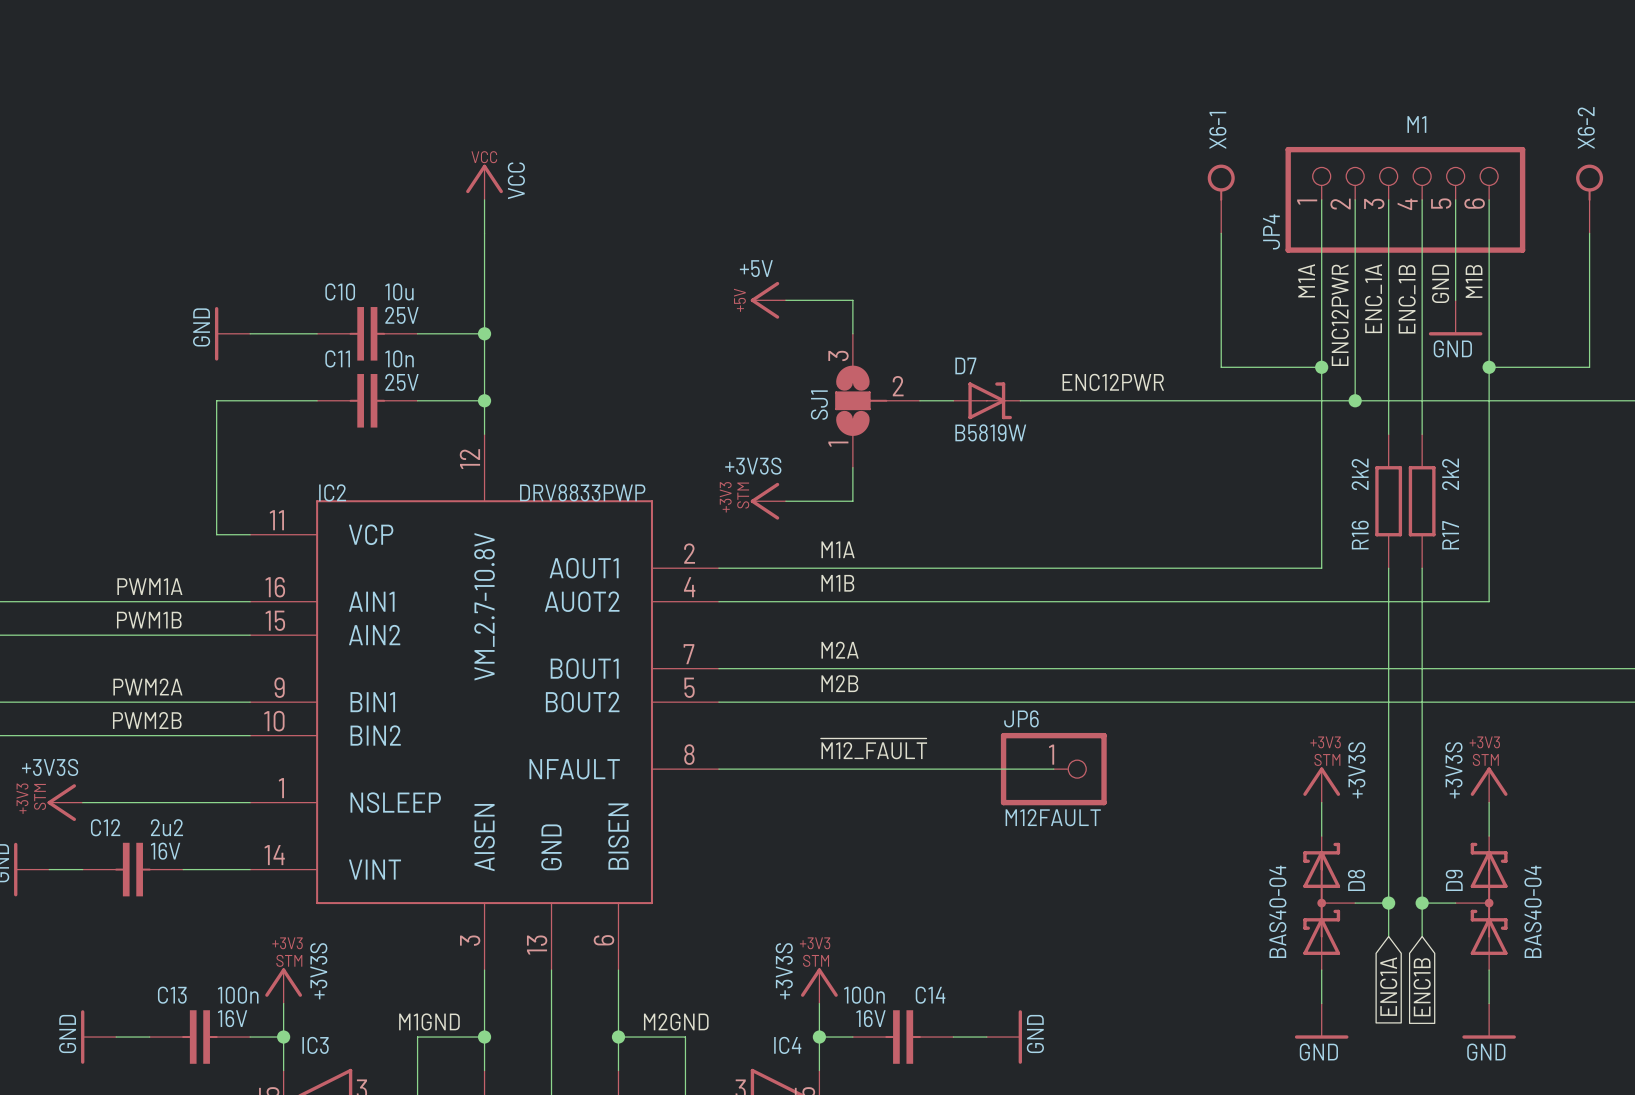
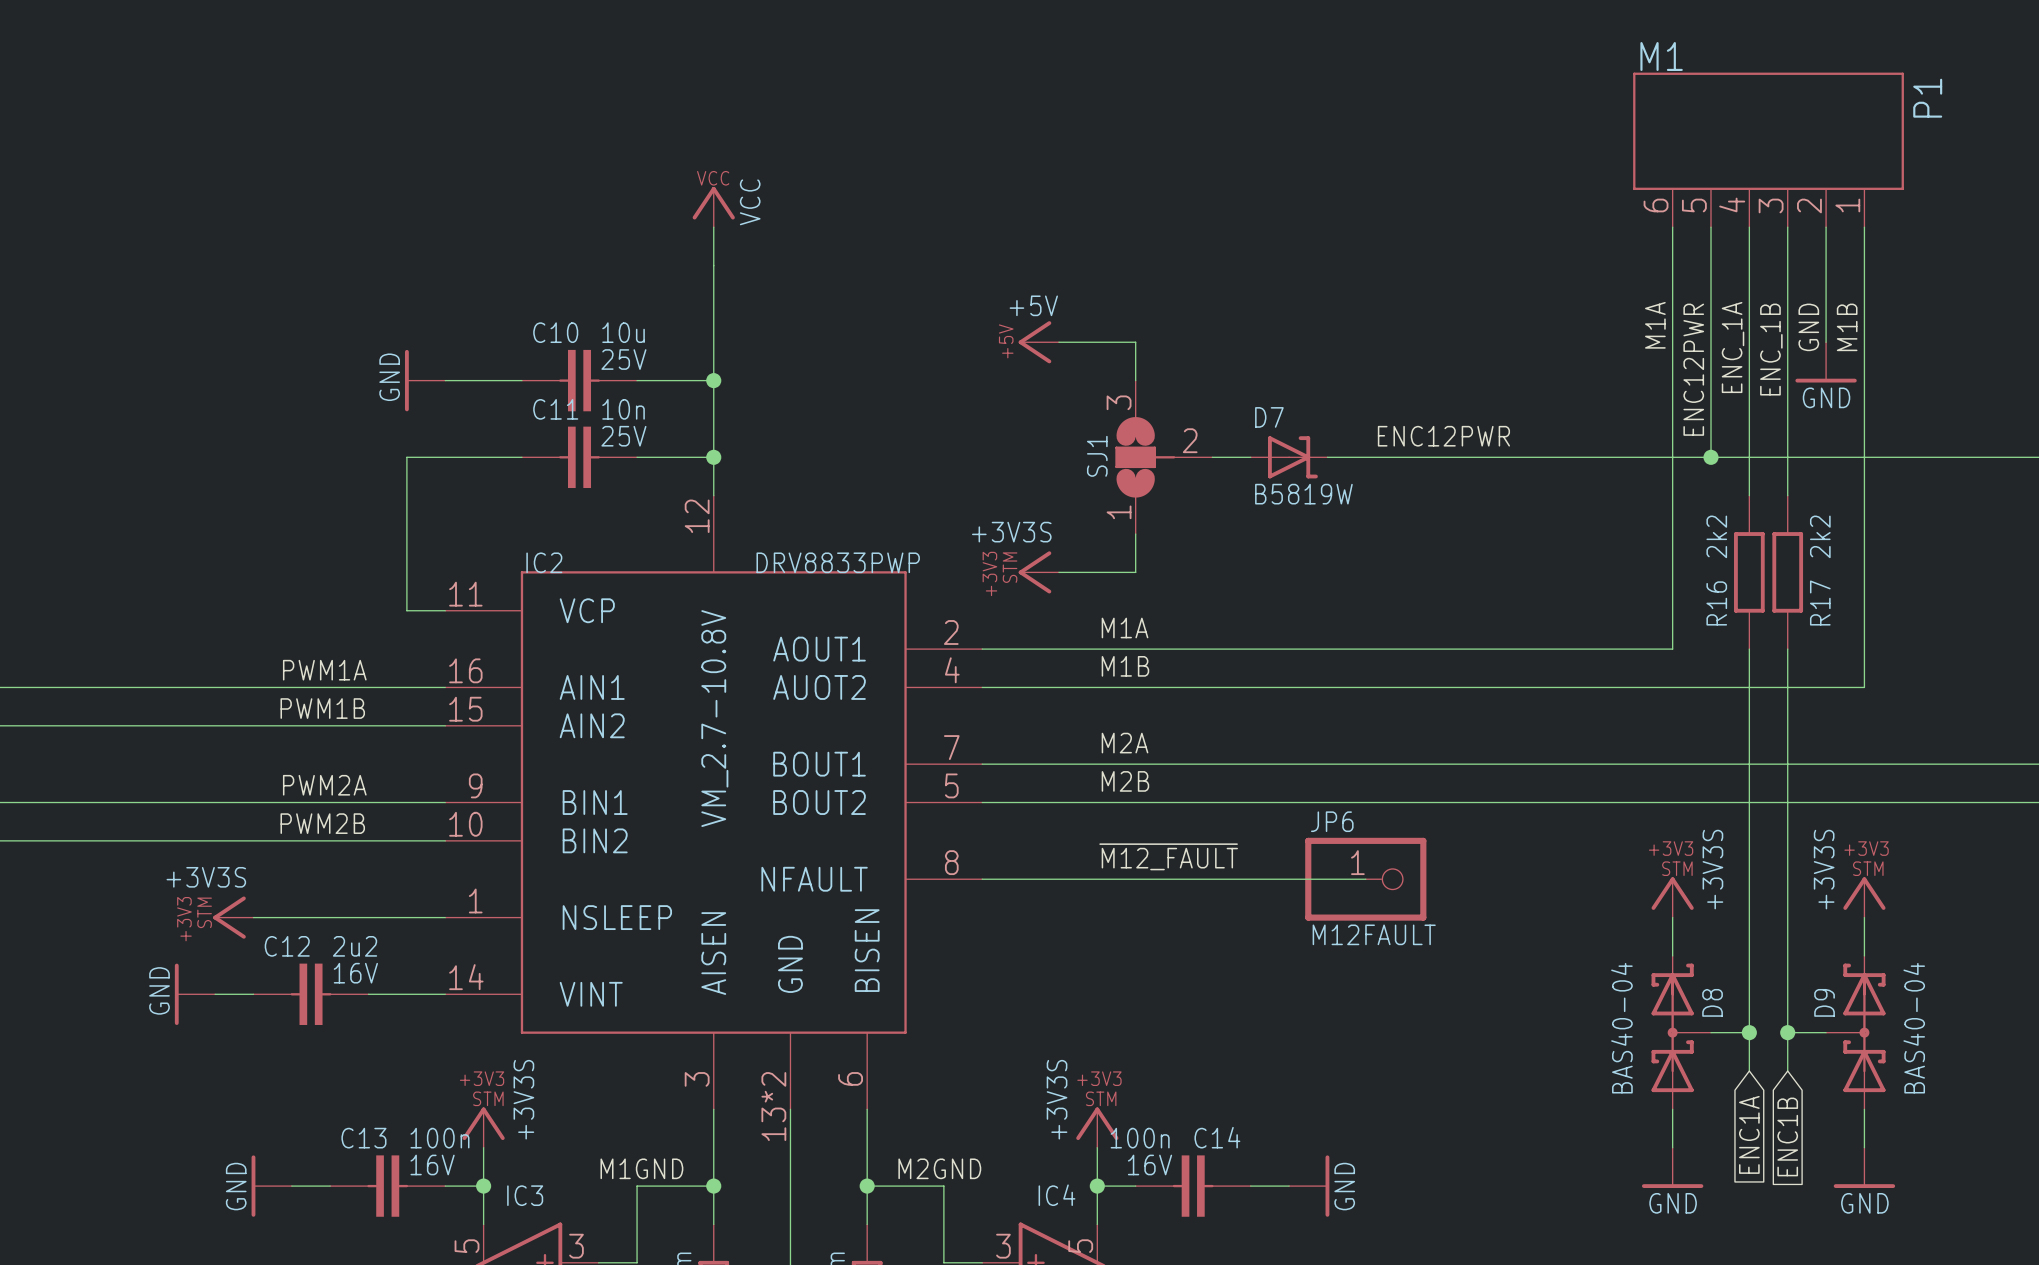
P1: none -> M1 (1768, 149)
X6-1: (1221, 198) -> none
X6-2: (1589, 198) -> none
JP4: M1 (1405, 199) -> none
wire: (1221, 233) (1221, 367) (1321, 367) -> none
wire: (1589, 233) (1589, 367) (1489, 367) -> none
junction: (1321, 367) -> none
junction: (1489, 367) -> none
IC2 pin number: 13 (537, 945) -> 13*2 (773, 1106)

